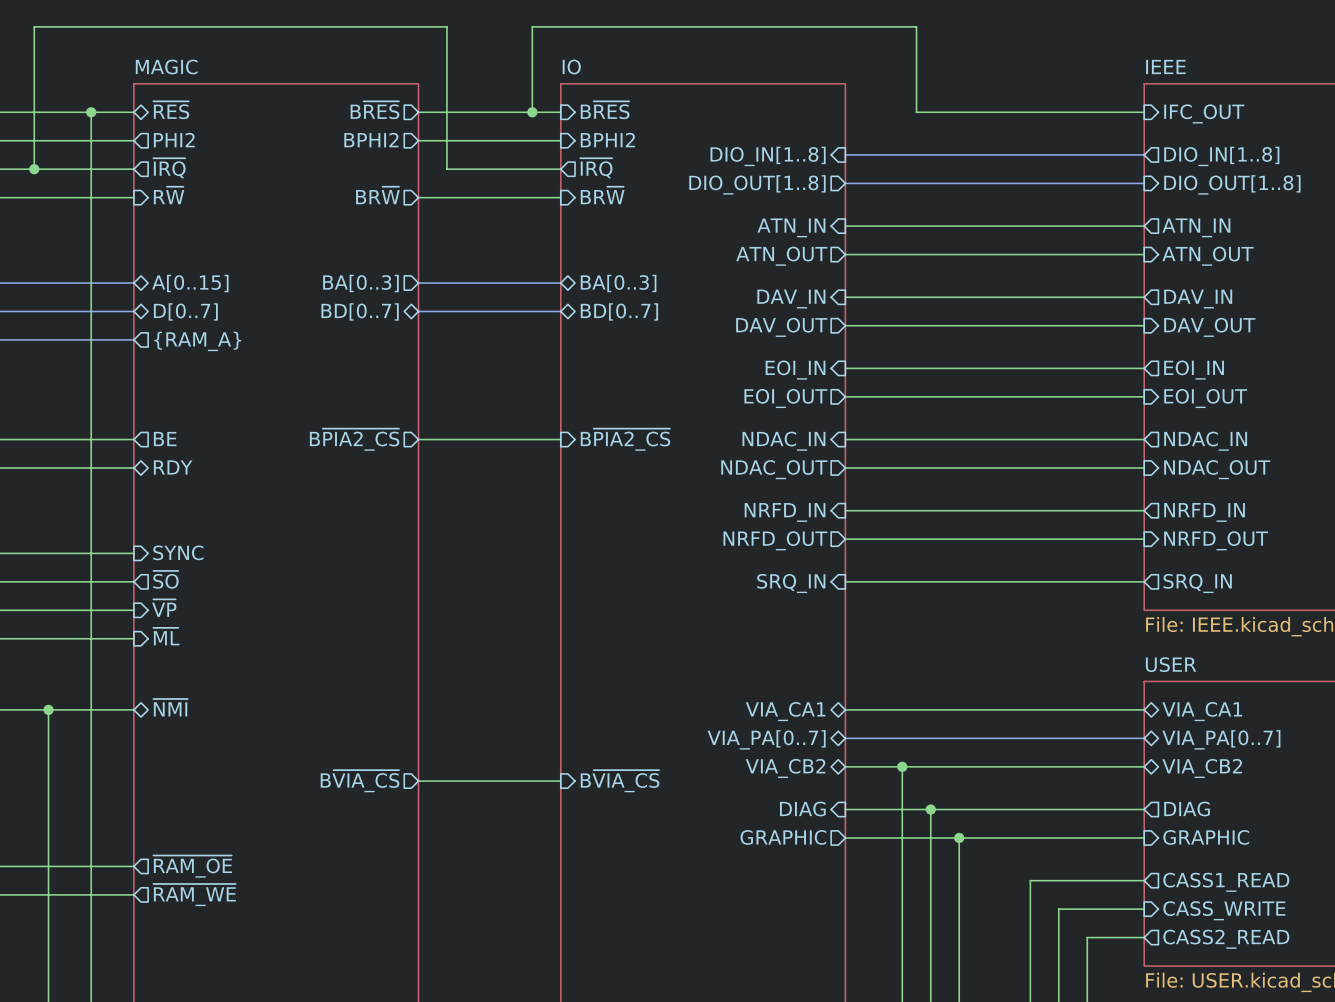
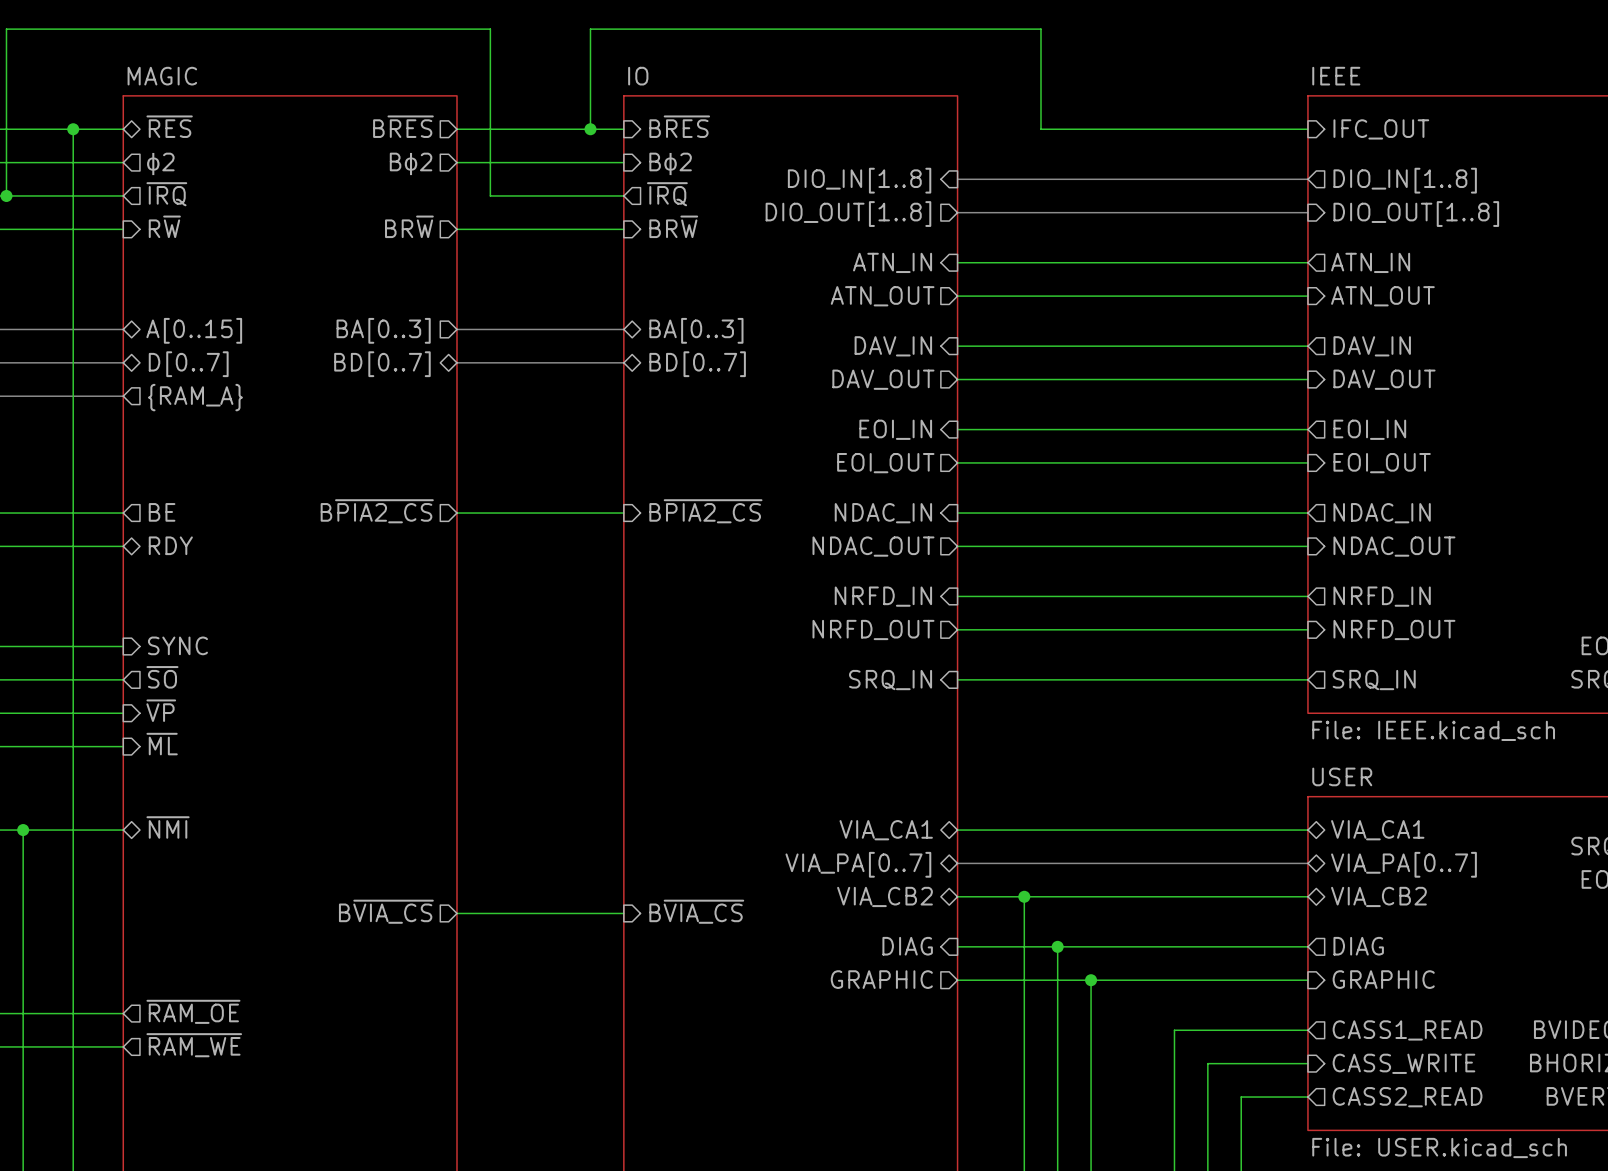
sheet pin: PHI2 (174, 140) -> ϕ2 (160, 164)
sheet pin: BPHI2 (371, 140) -> Bϕ2 (411, 164)
sheet pin: BPHI2 (607, 140) -> Bϕ2 (670, 164)

